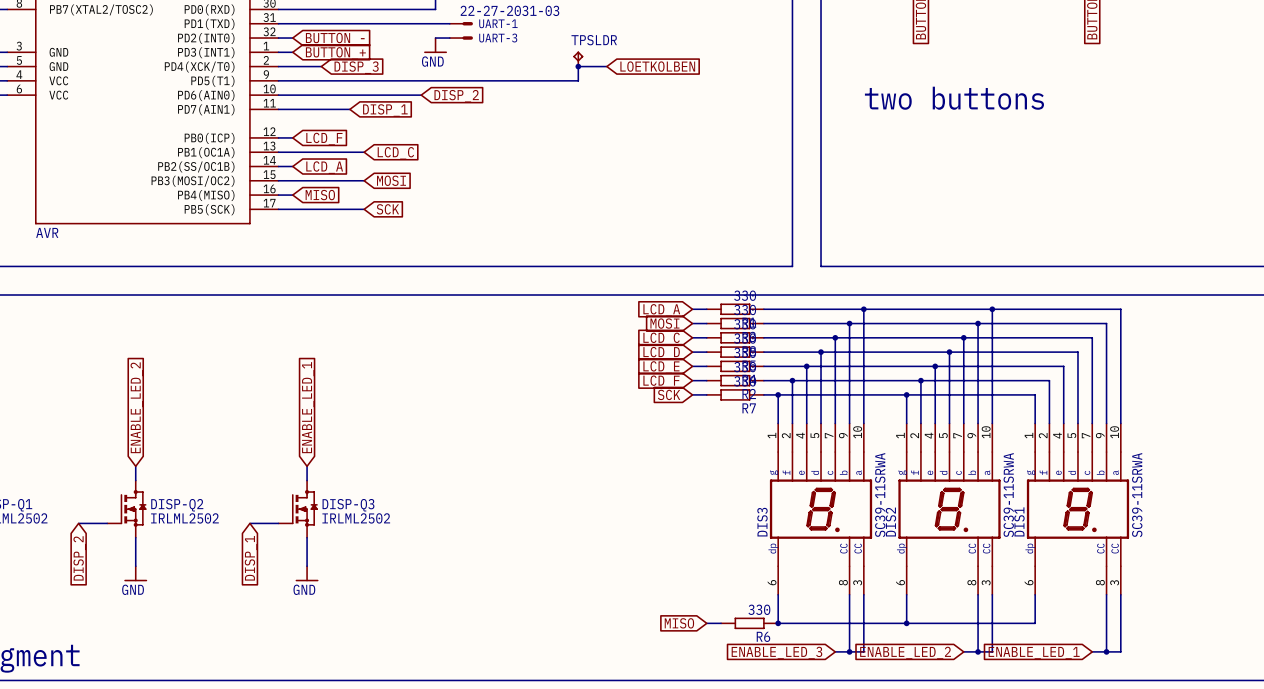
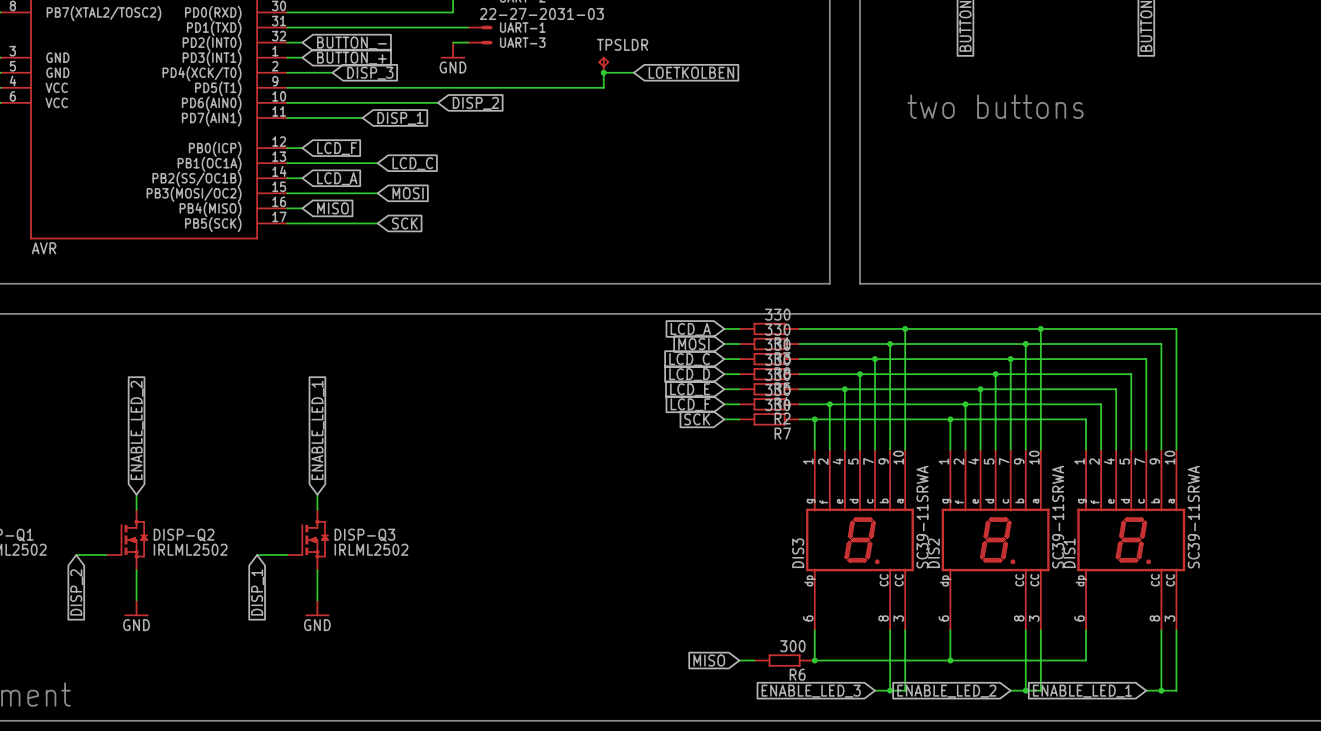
R6 value: 330 (759, 609) -> 300 (792, 646)

